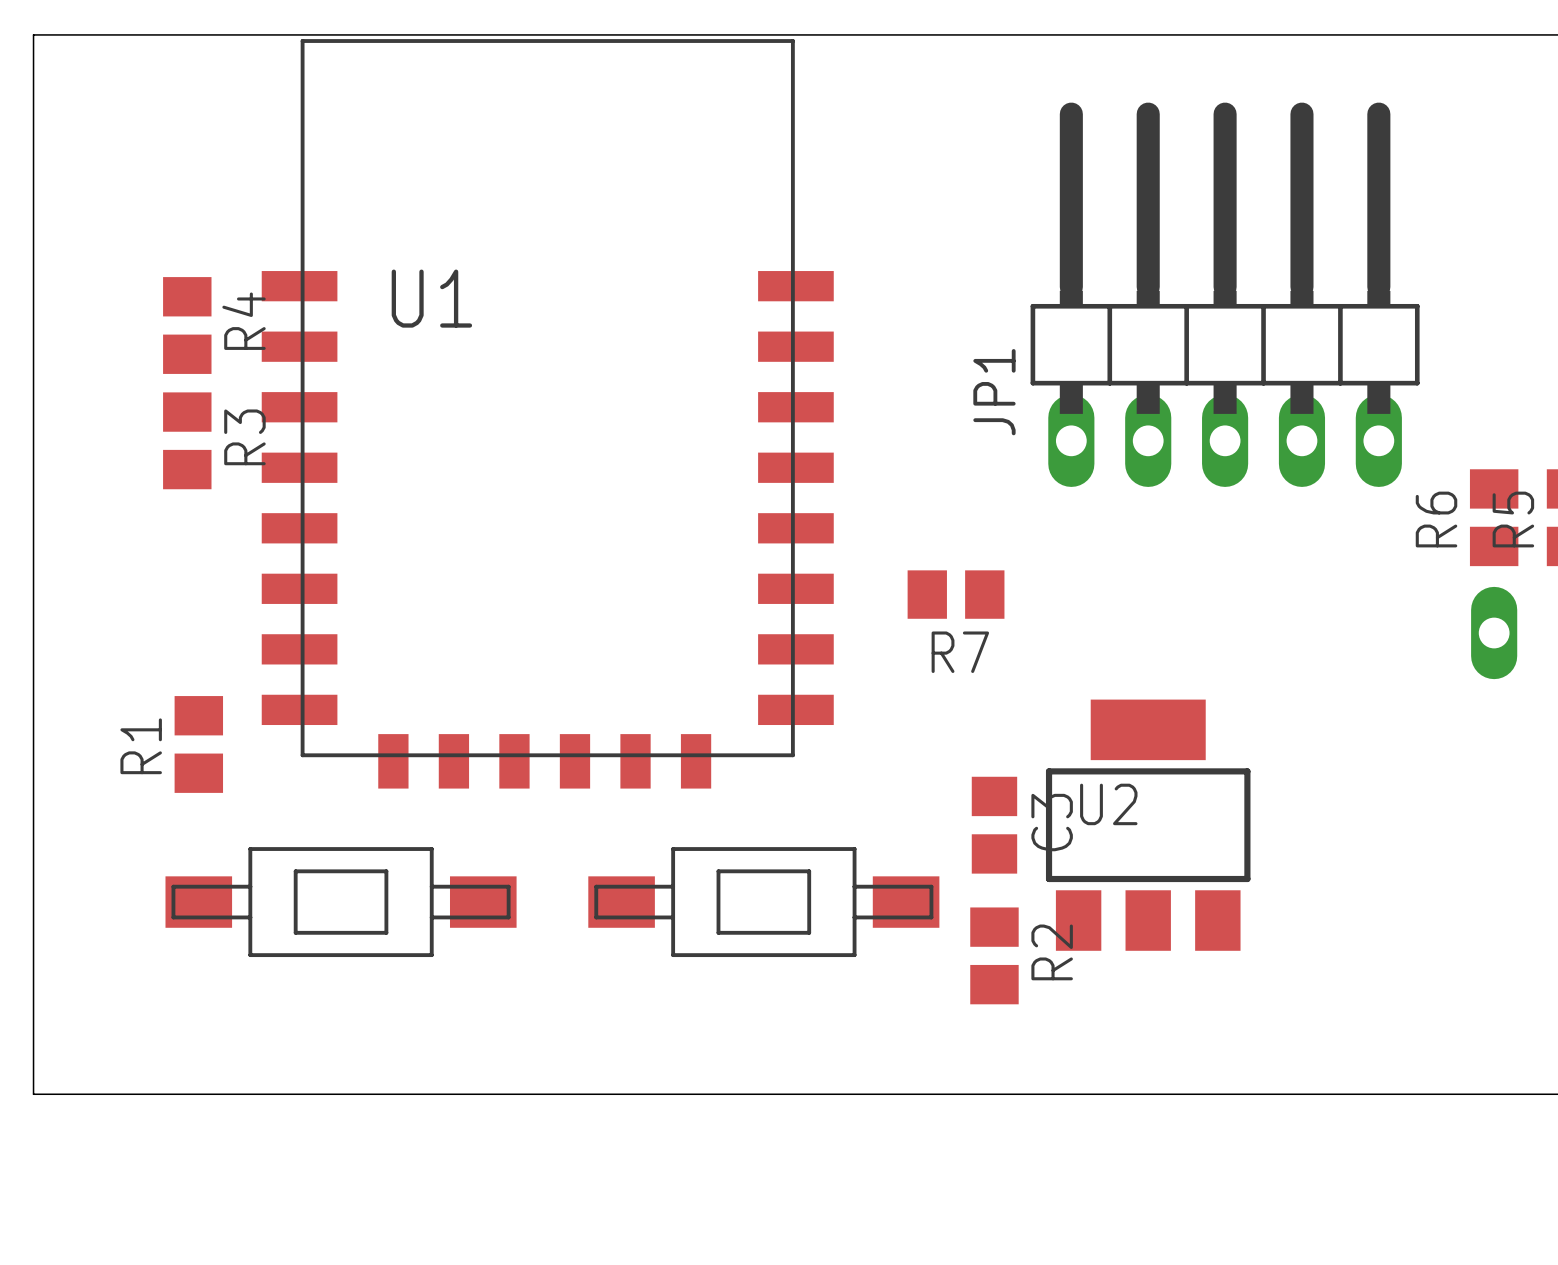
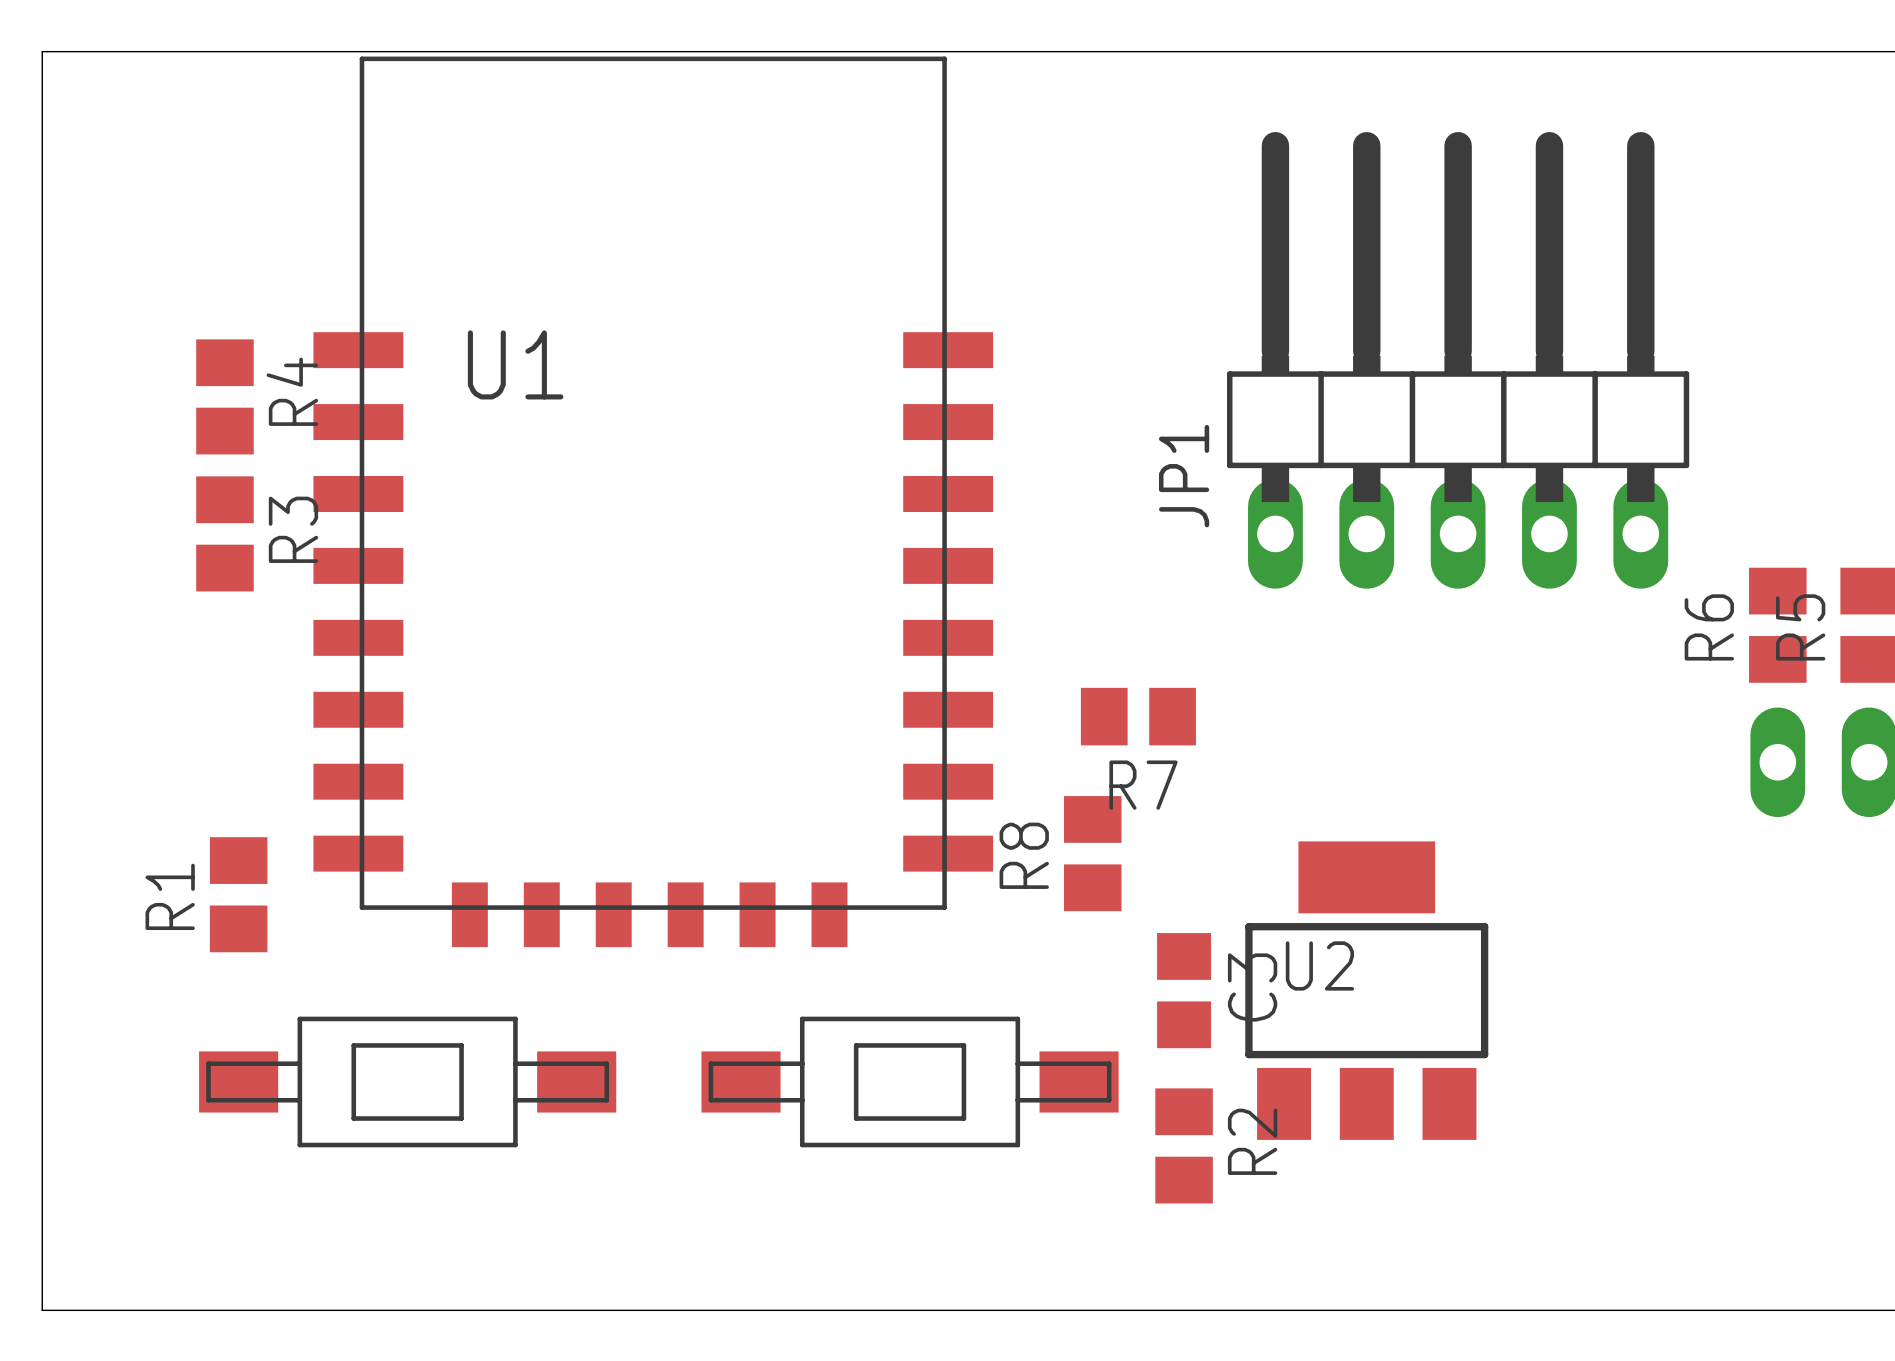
R8: none -> (1092, 853)

